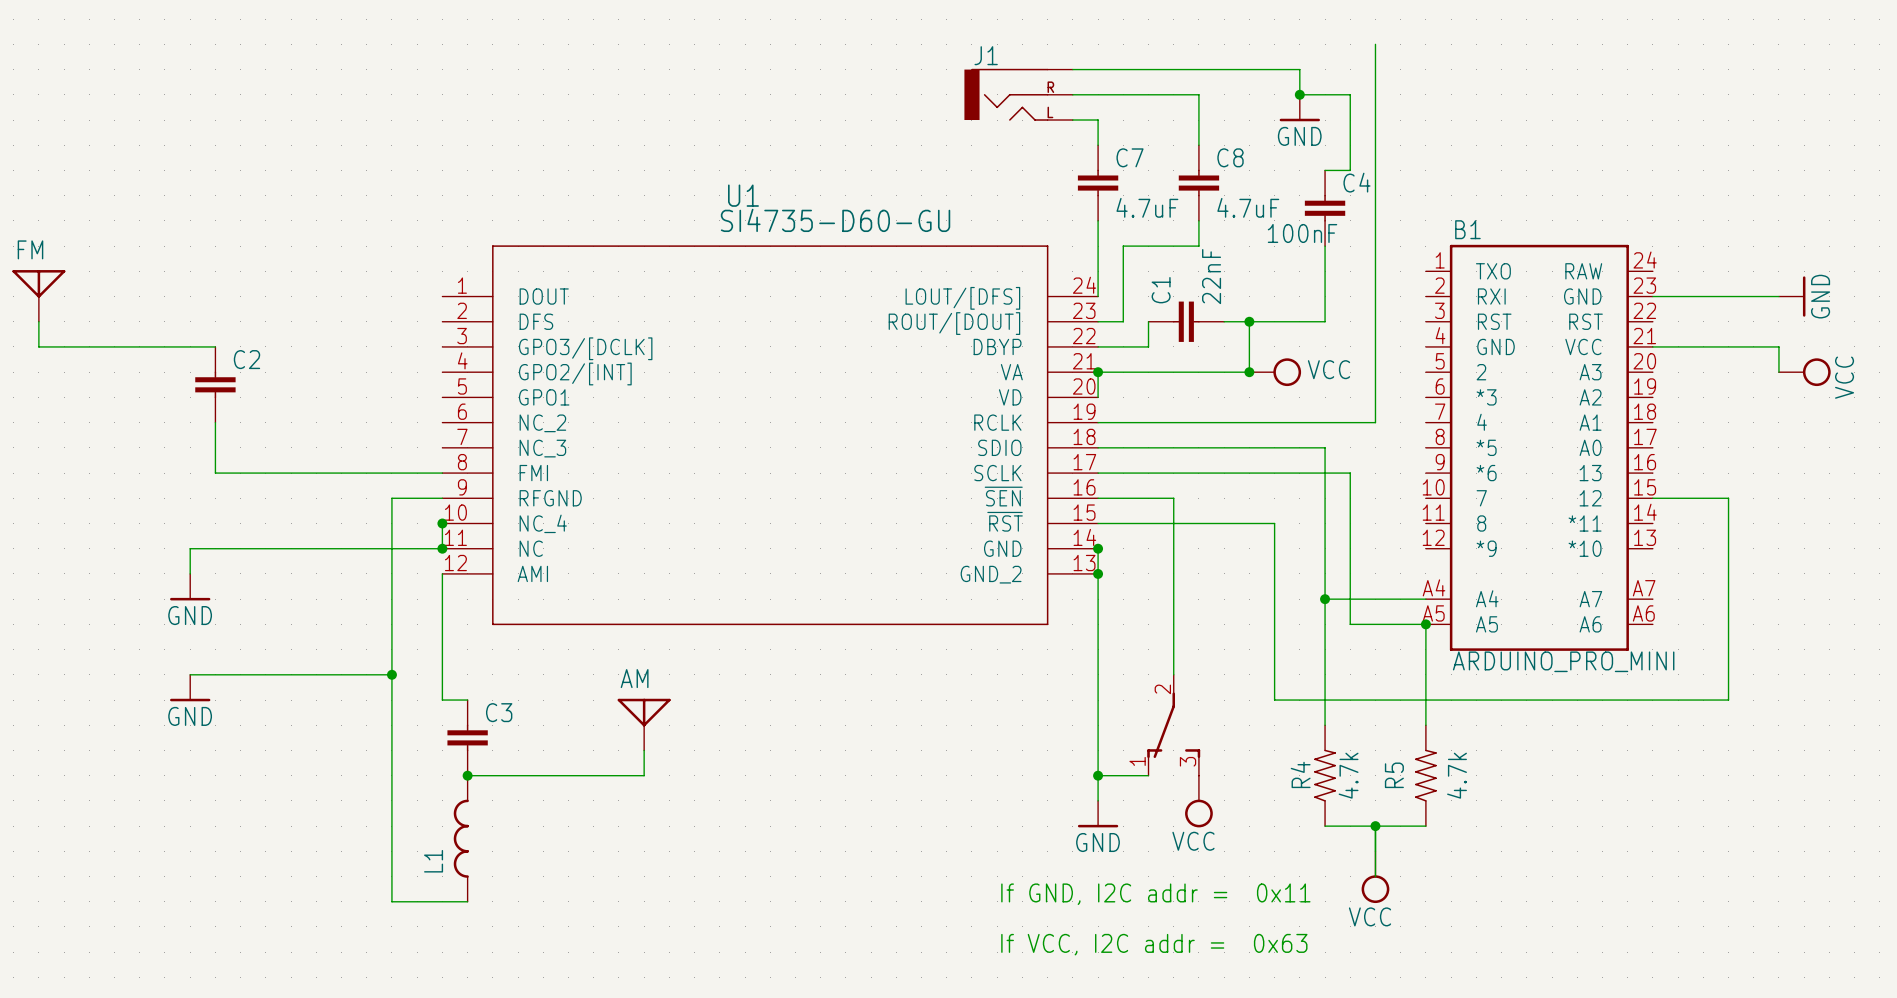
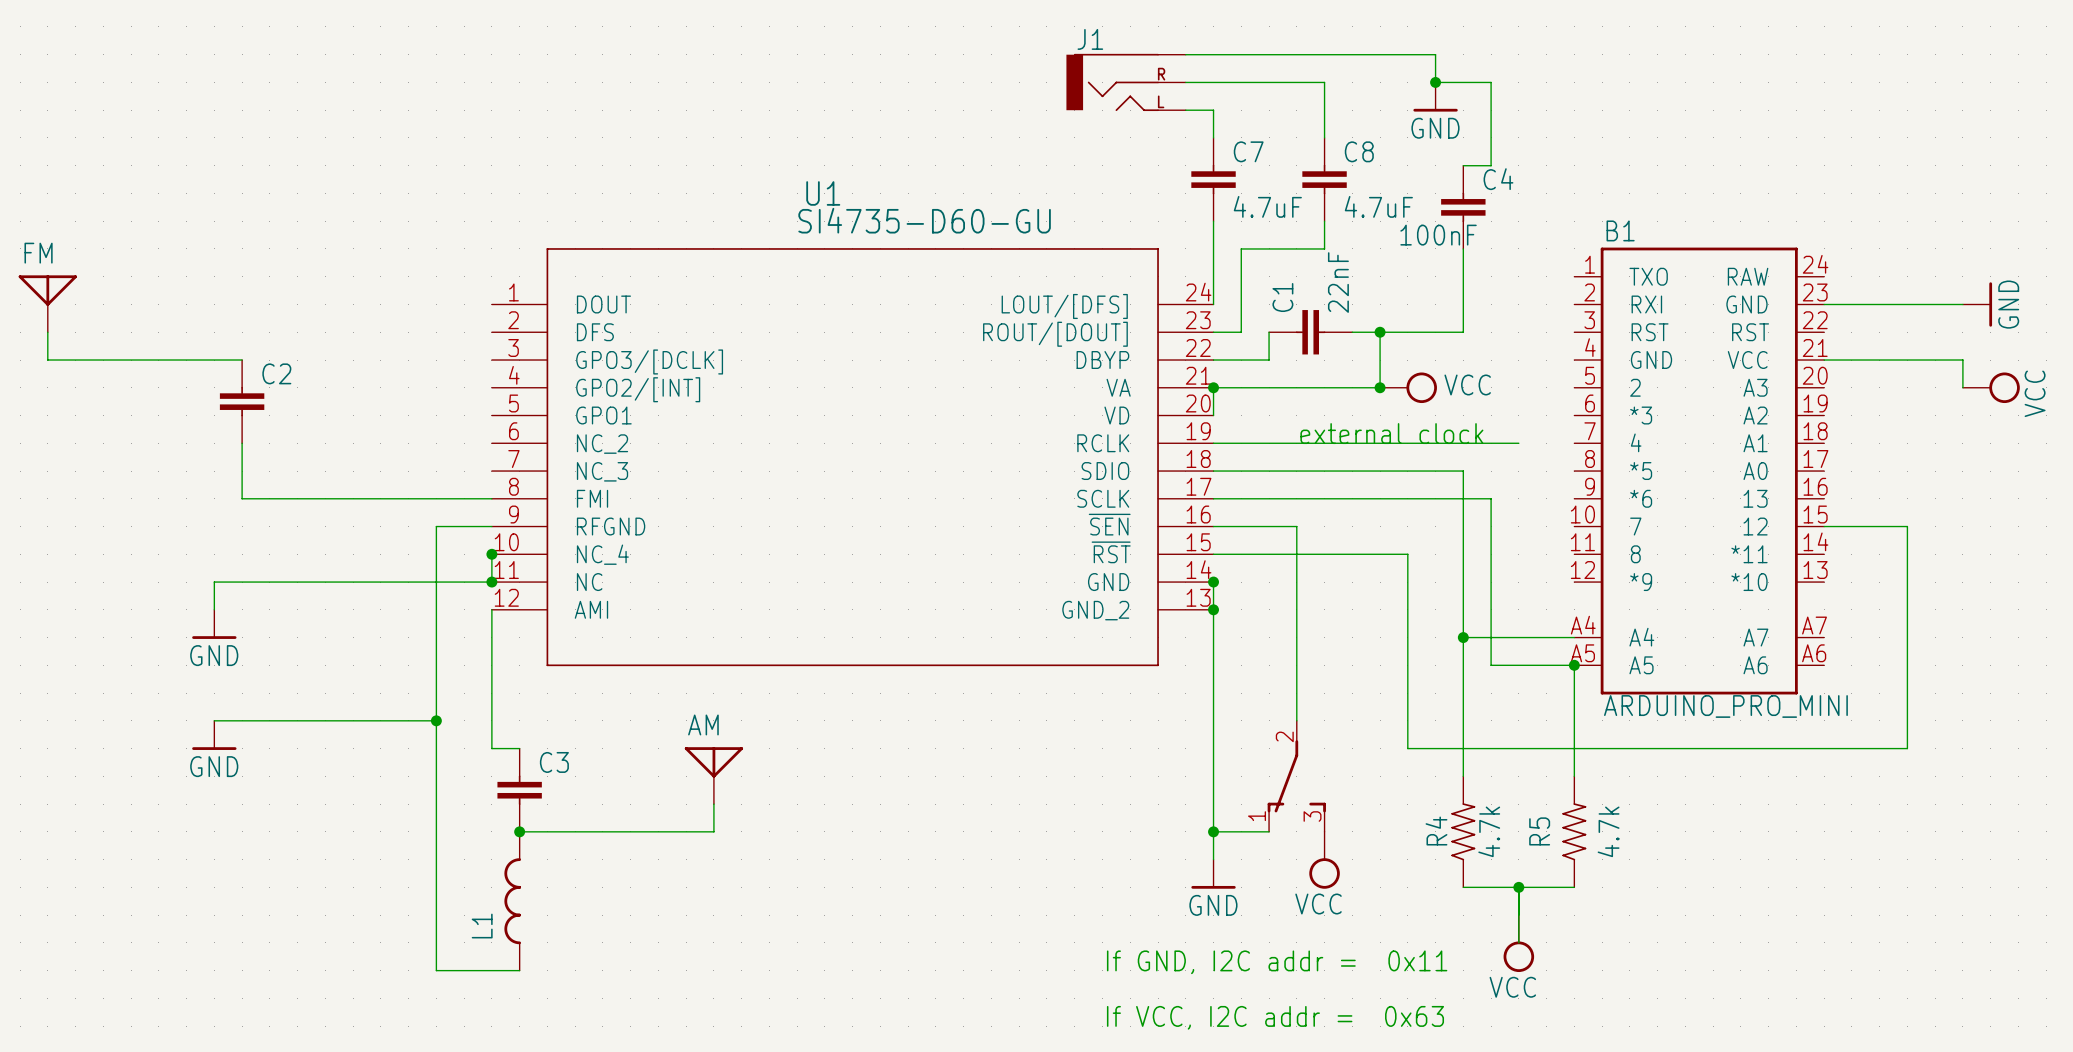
wire: (1375, 44) (1375, 422) -> none
text: none -> external clock (1391, 433)

